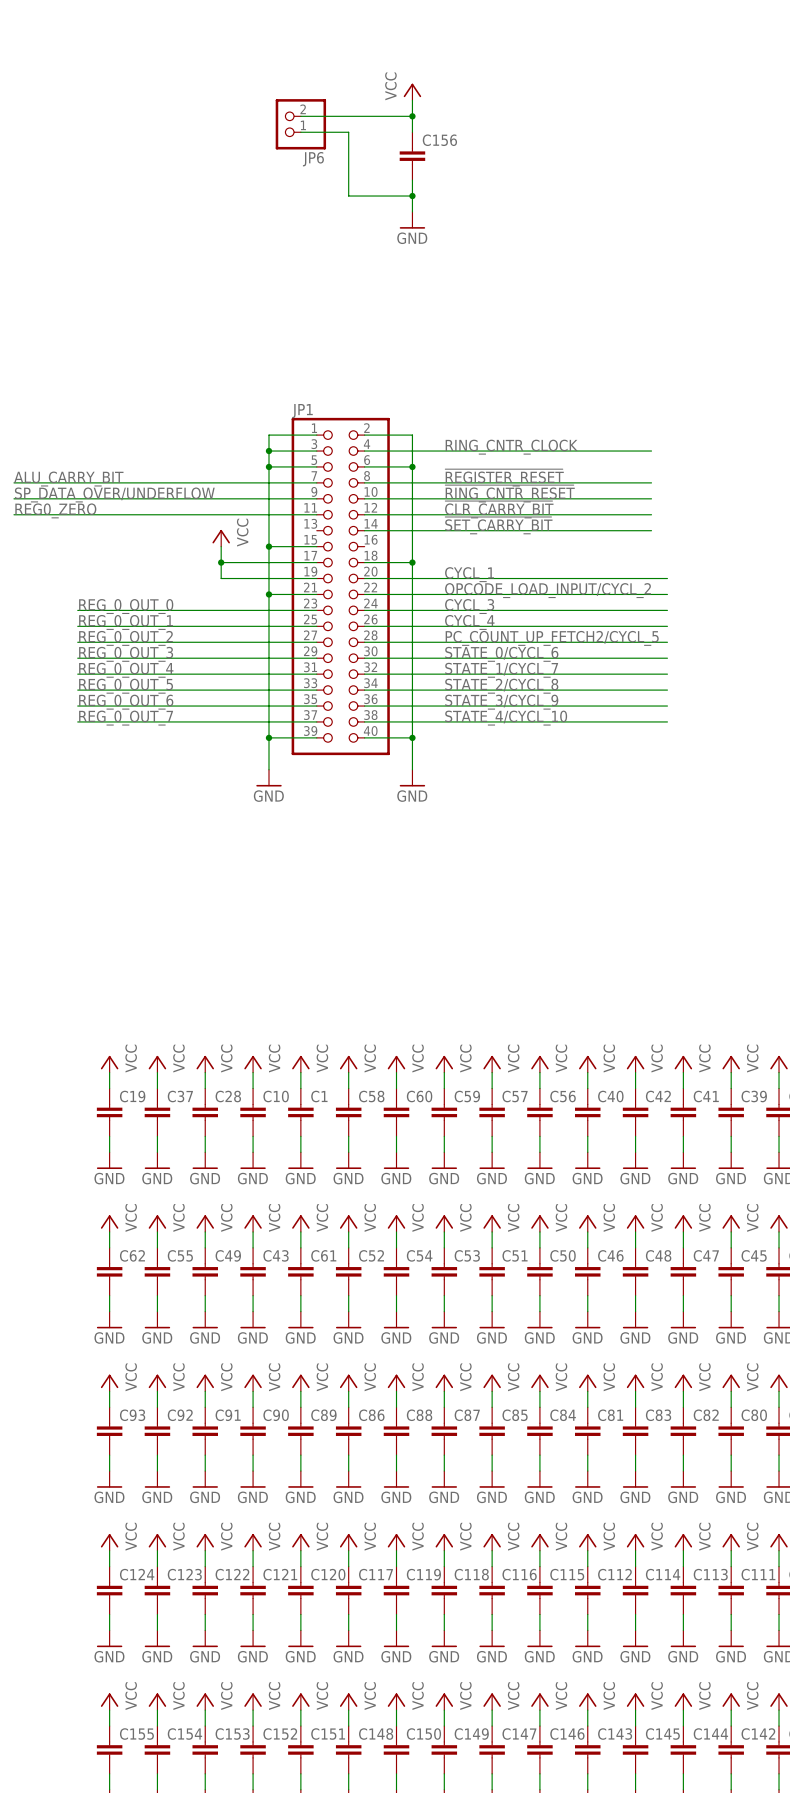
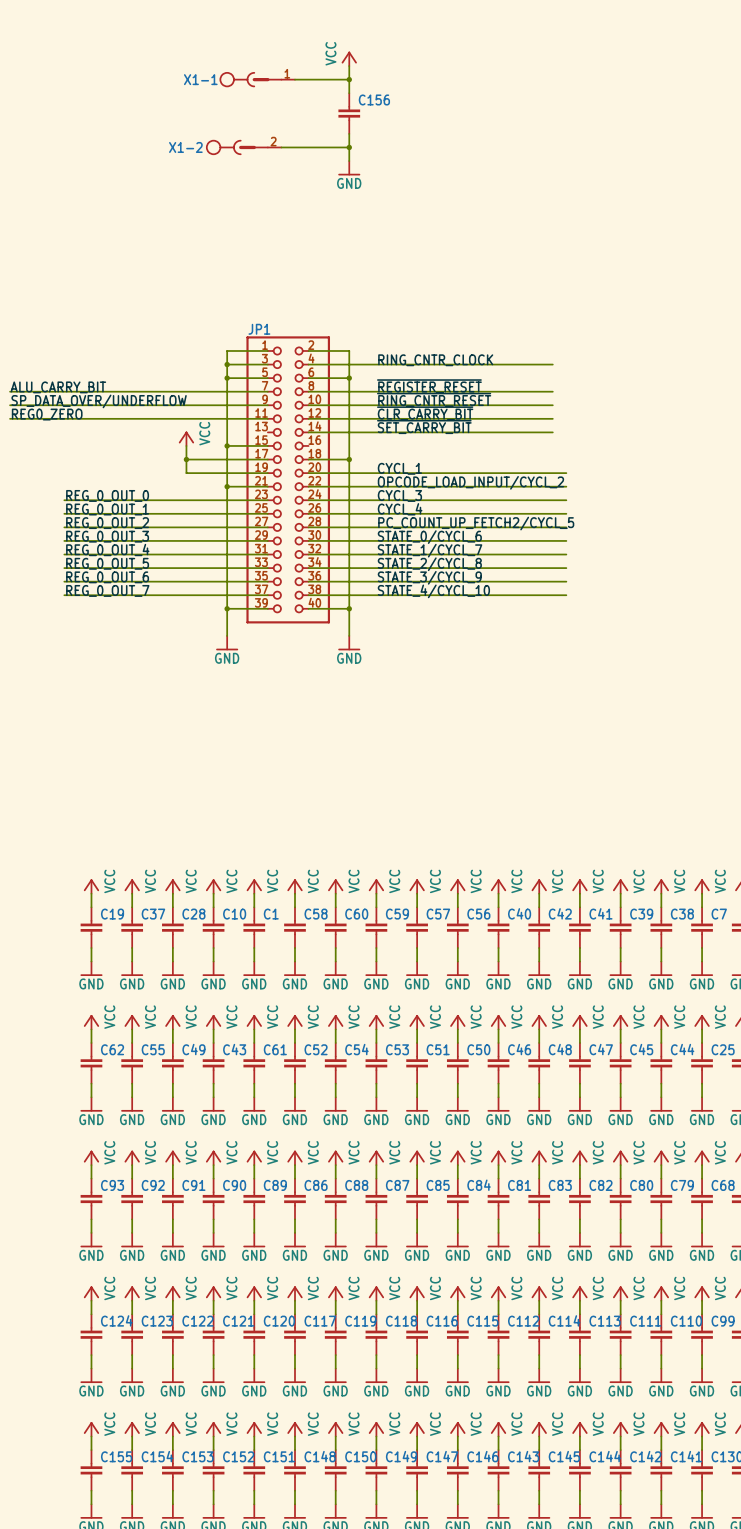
X1-1: none -> (257, 79)
JP6: (300, 124) -> none
wire: (300, 132) (348, 132) (348, 196) -> (281, 147) (295, 147)
X1-2: none -> (243, 147)

